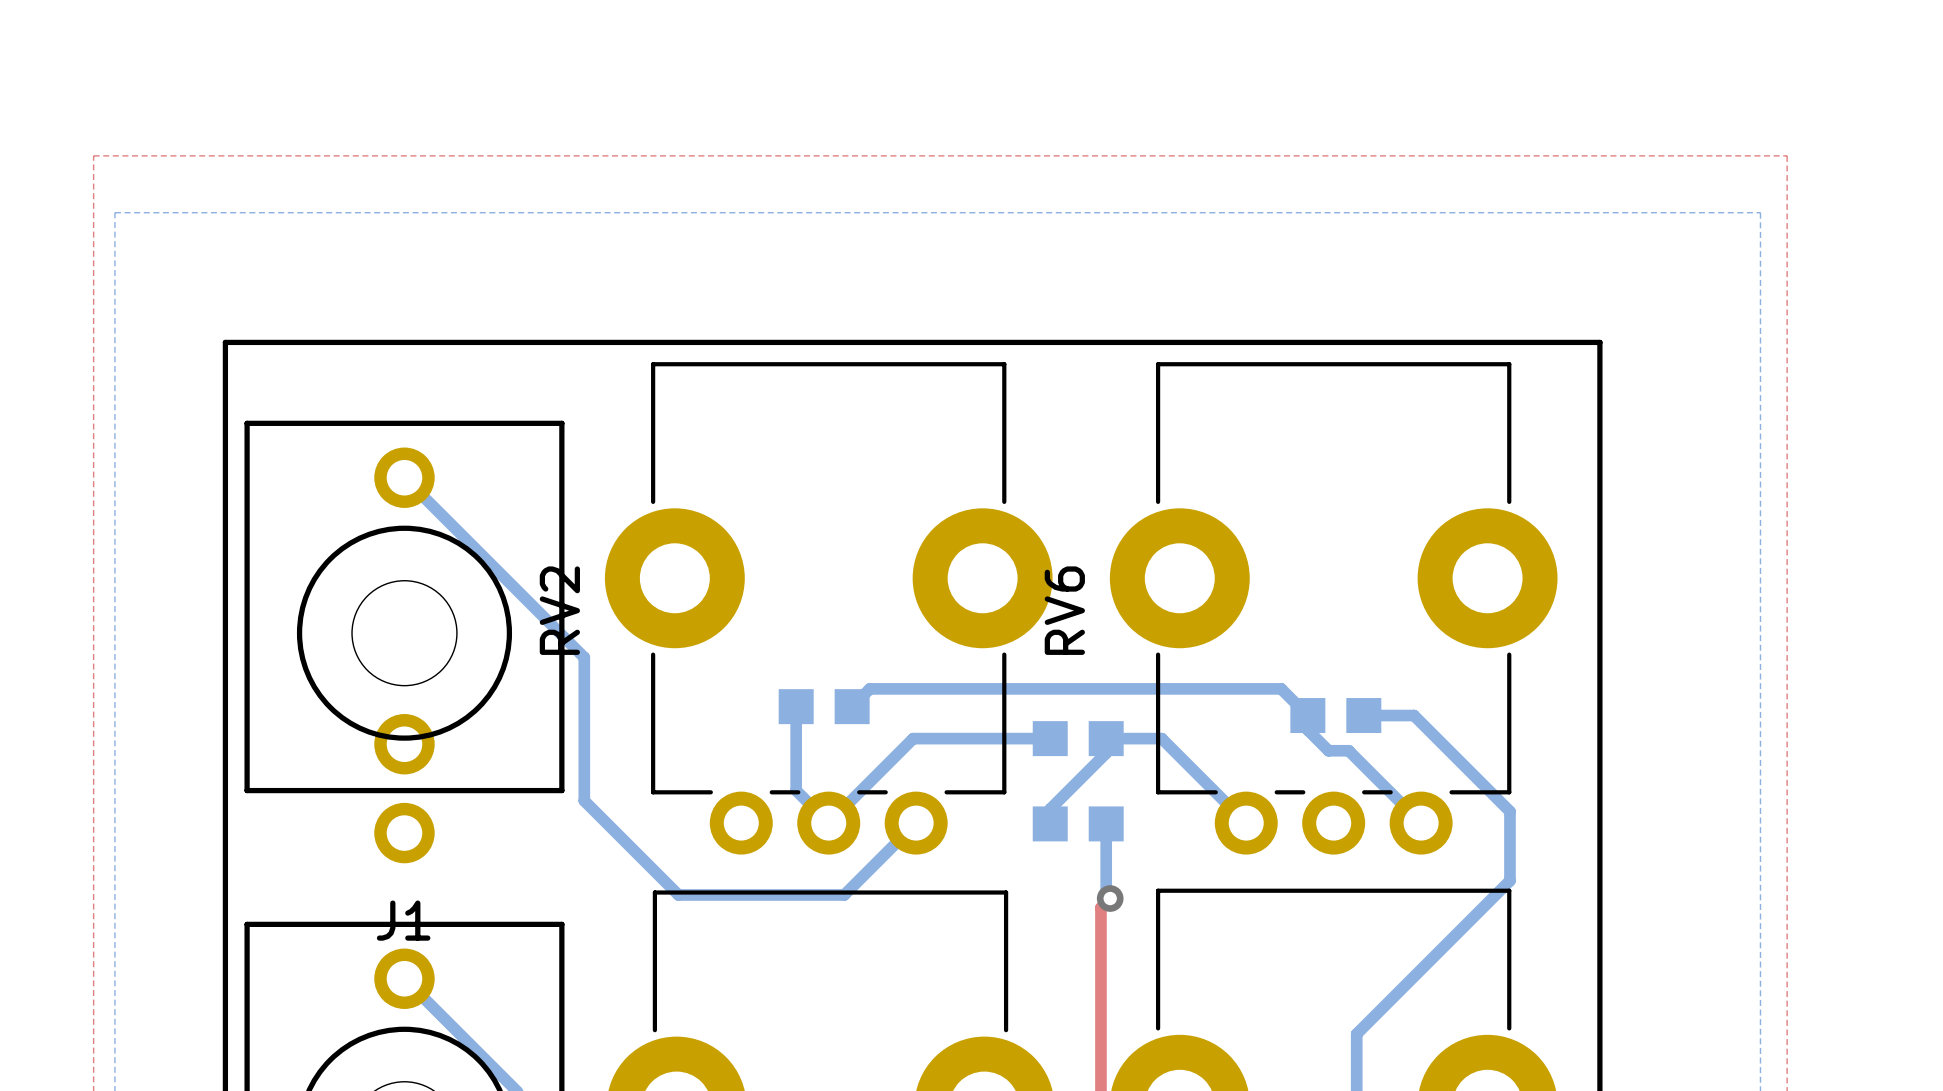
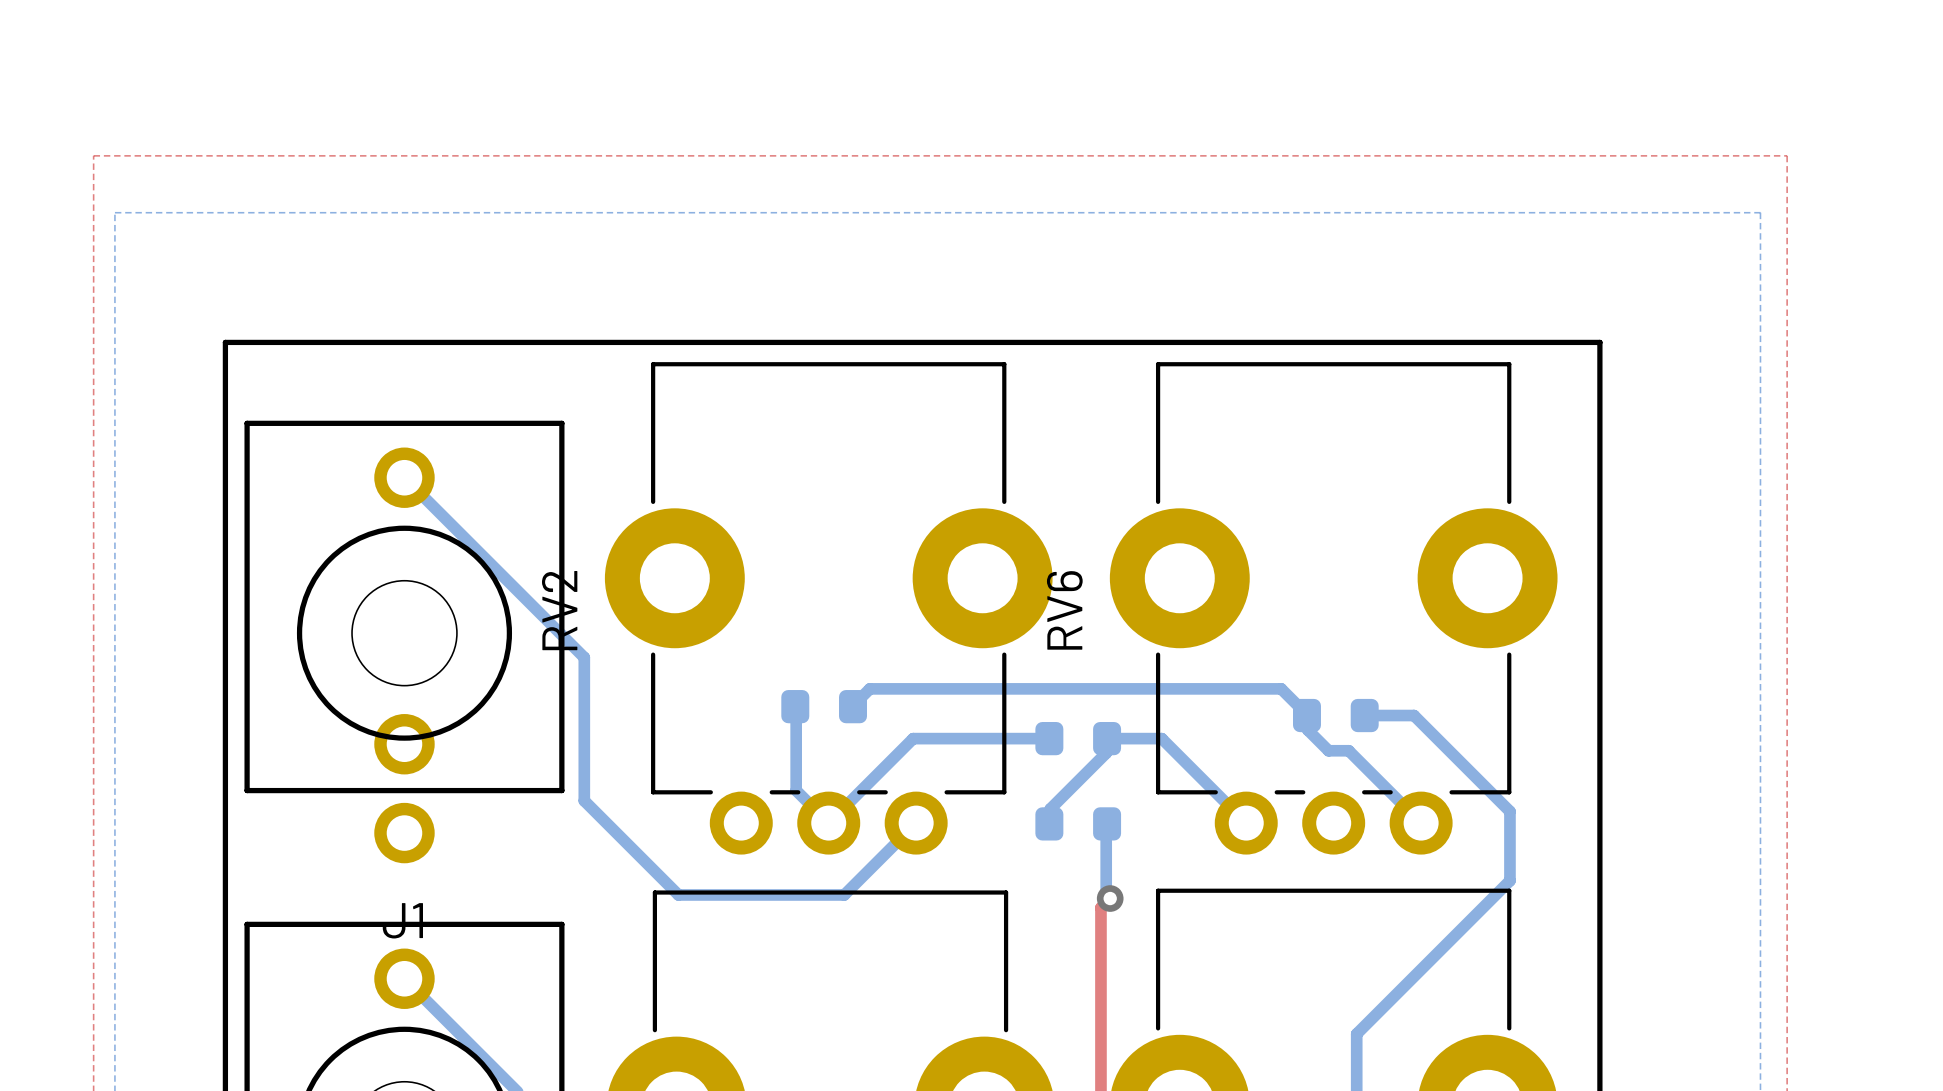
part footprint: [778, 689, 870, 725] -> [781, 690, 868, 724]
part footprint: [1290, 698, 1382, 734] -> [1293, 698, 1379, 733]
part footprint: [1032, 721, 1124, 757] -> [1035, 722, 1122, 756]
part footprint: [1032, 806, 1124, 842] -> [1035, 807, 1122, 841]

